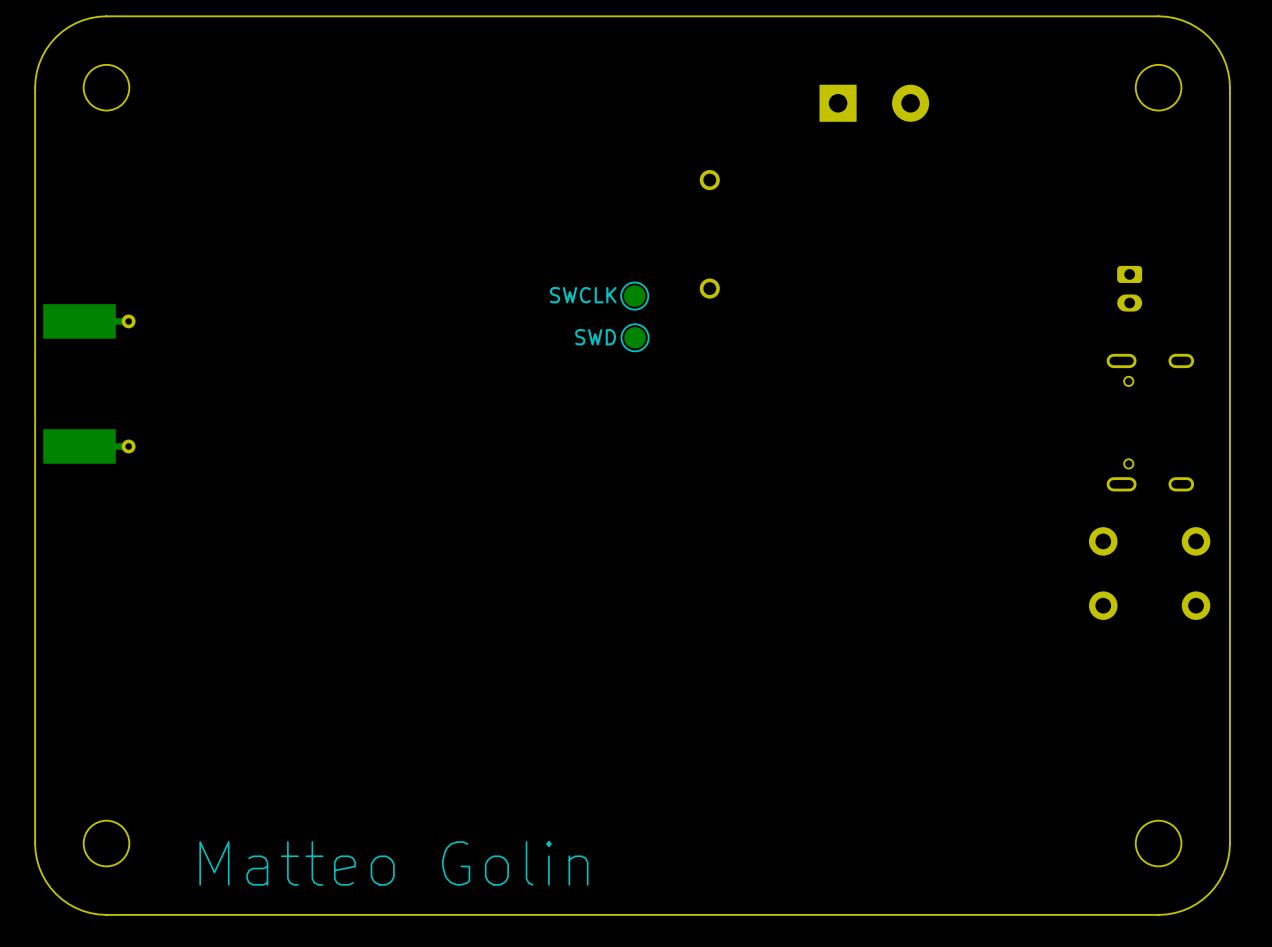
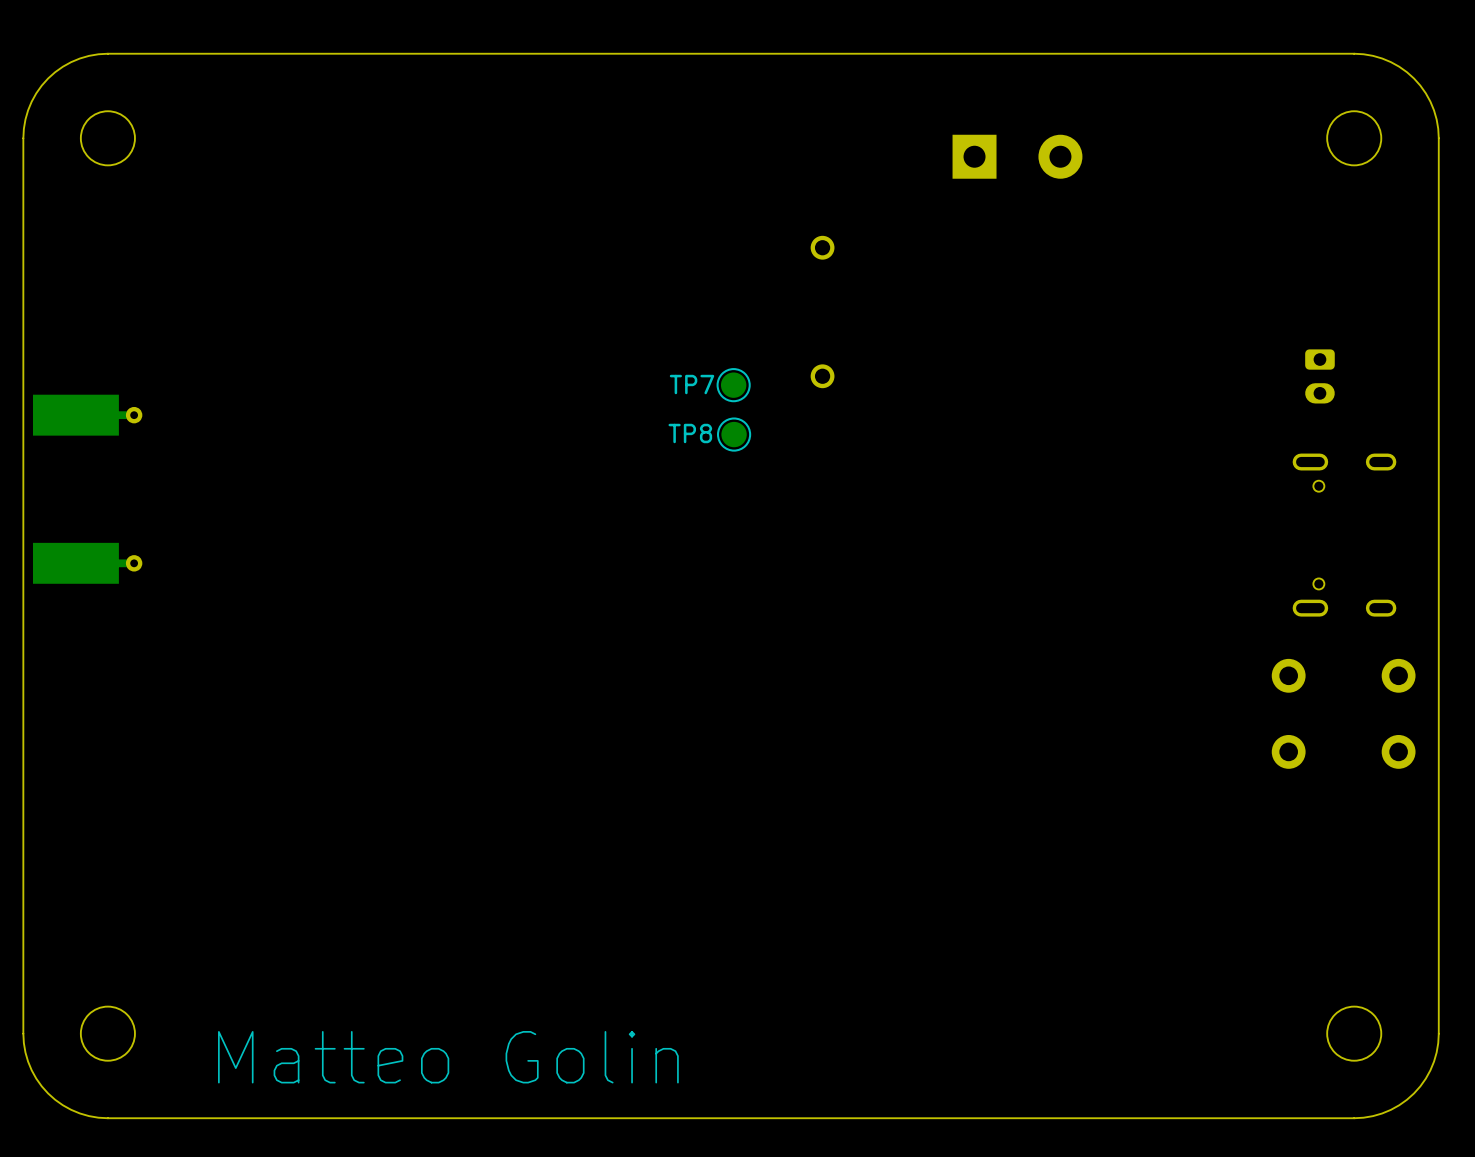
SWCLK name: SWCLK (583, 295) -> TP7 (692, 384)
SWD name: SWD (595, 337) -> TP8 (690, 433)

